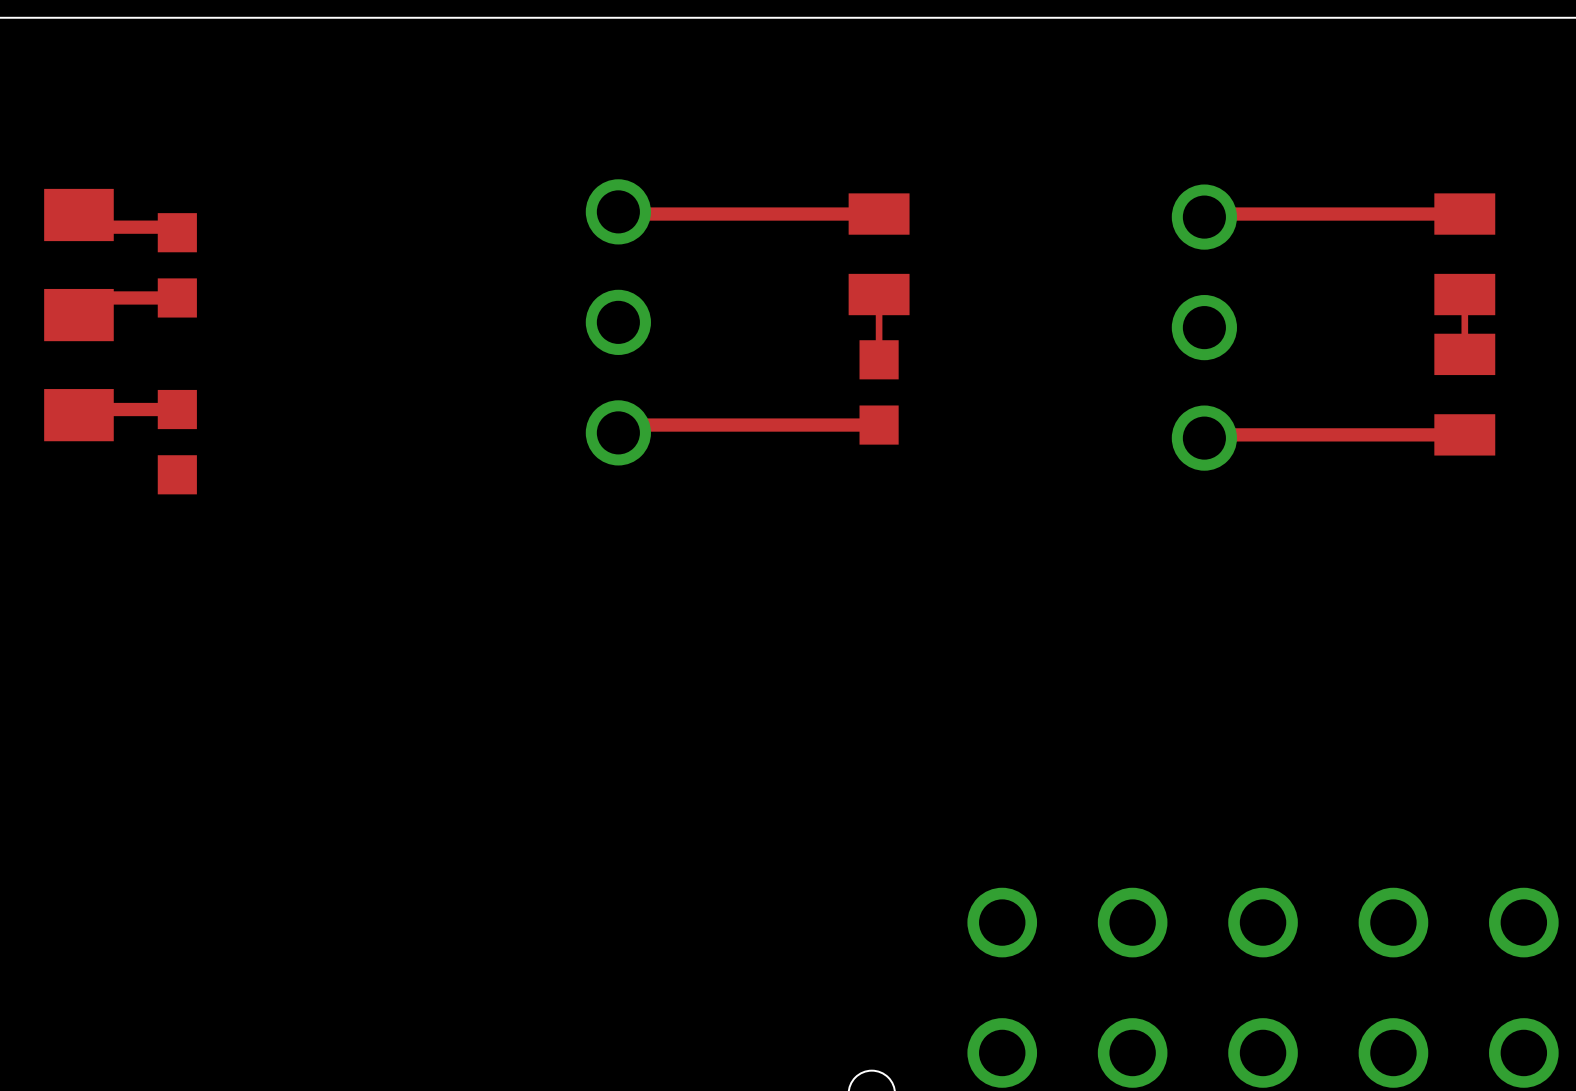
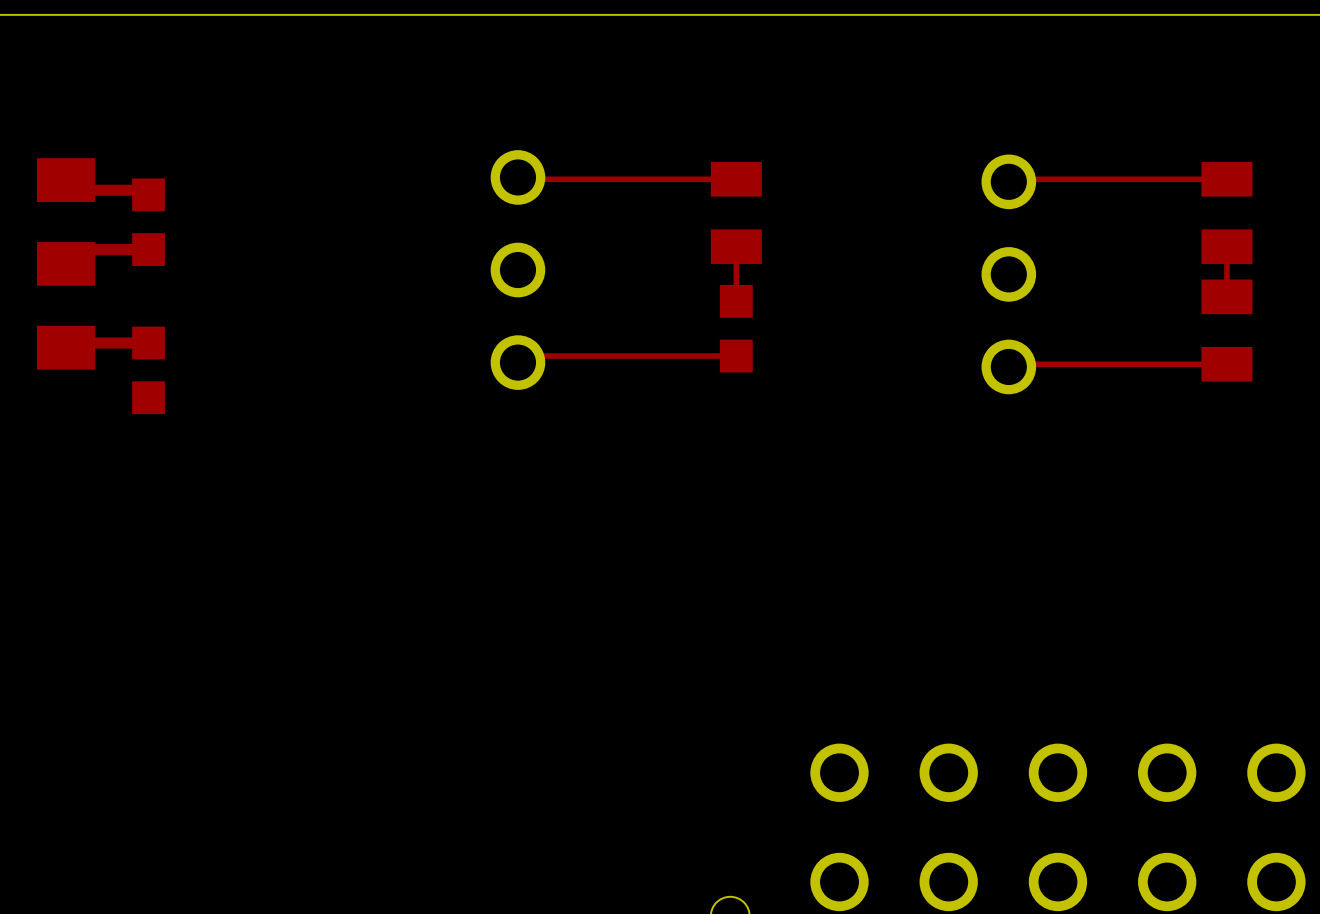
top track width: thick (618, 211) (620, 214) (879, 214) -> thin (517, 177) (519, 179) (736, 179)
top track width: thick (1464, 214) (1207, 214) (1204, 217) -> thin (1226, 179) (1011, 179) (1008, 181)
top track width: thick (879, 425) (626, 425) (618, 432) -> thin (736, 356) (524, 356) (517, 362)
top track width: thick (1464, 434) (1207, 434) (1204, 438) -> thin (1226, 364) (1011, 364) (1008, 366)

